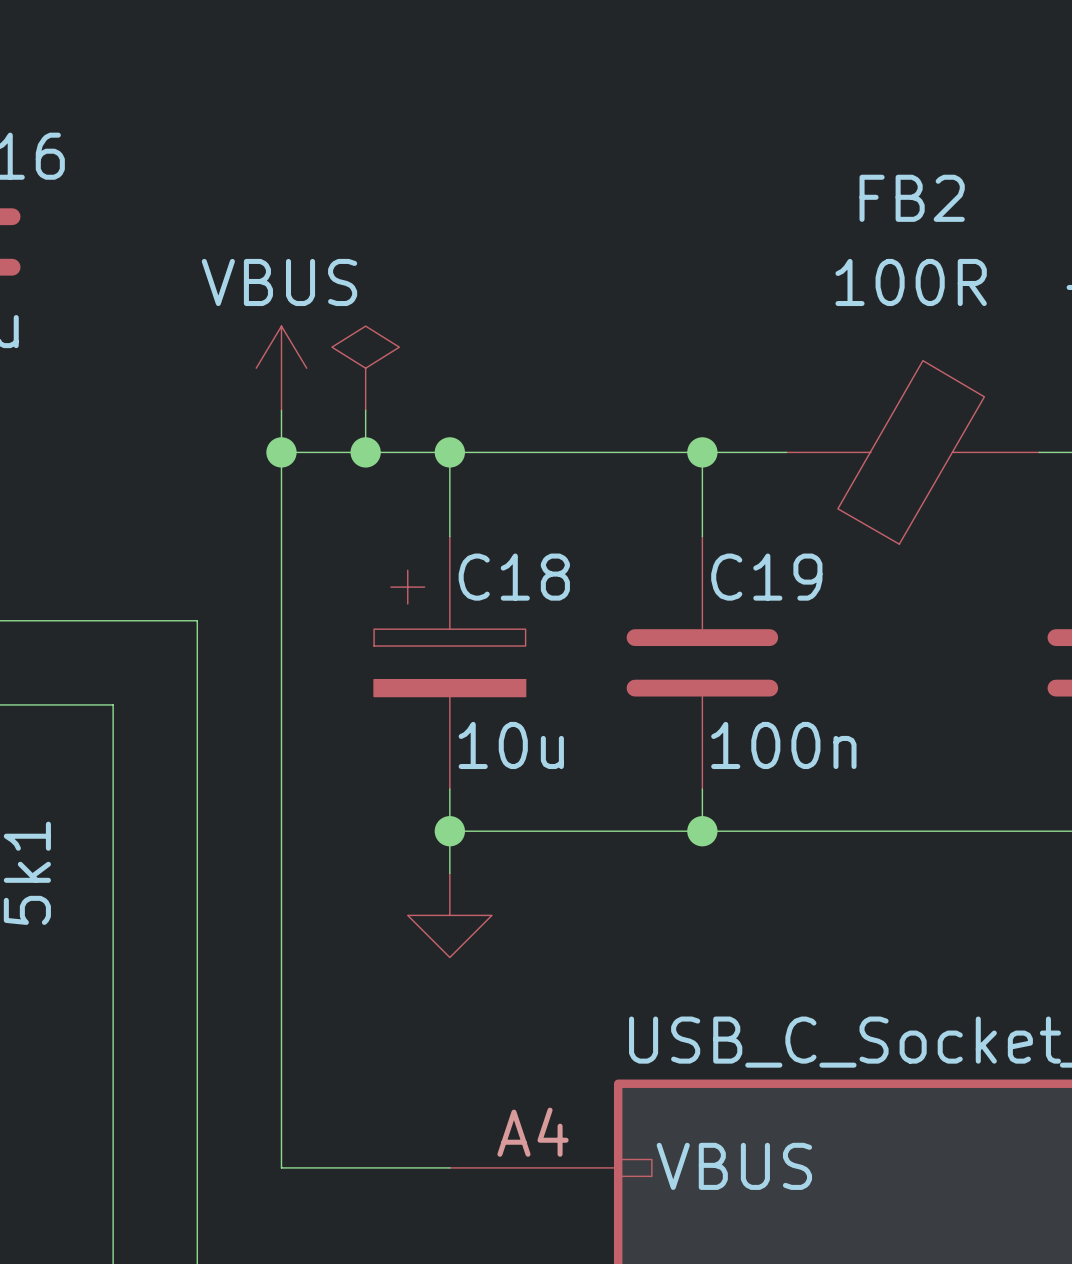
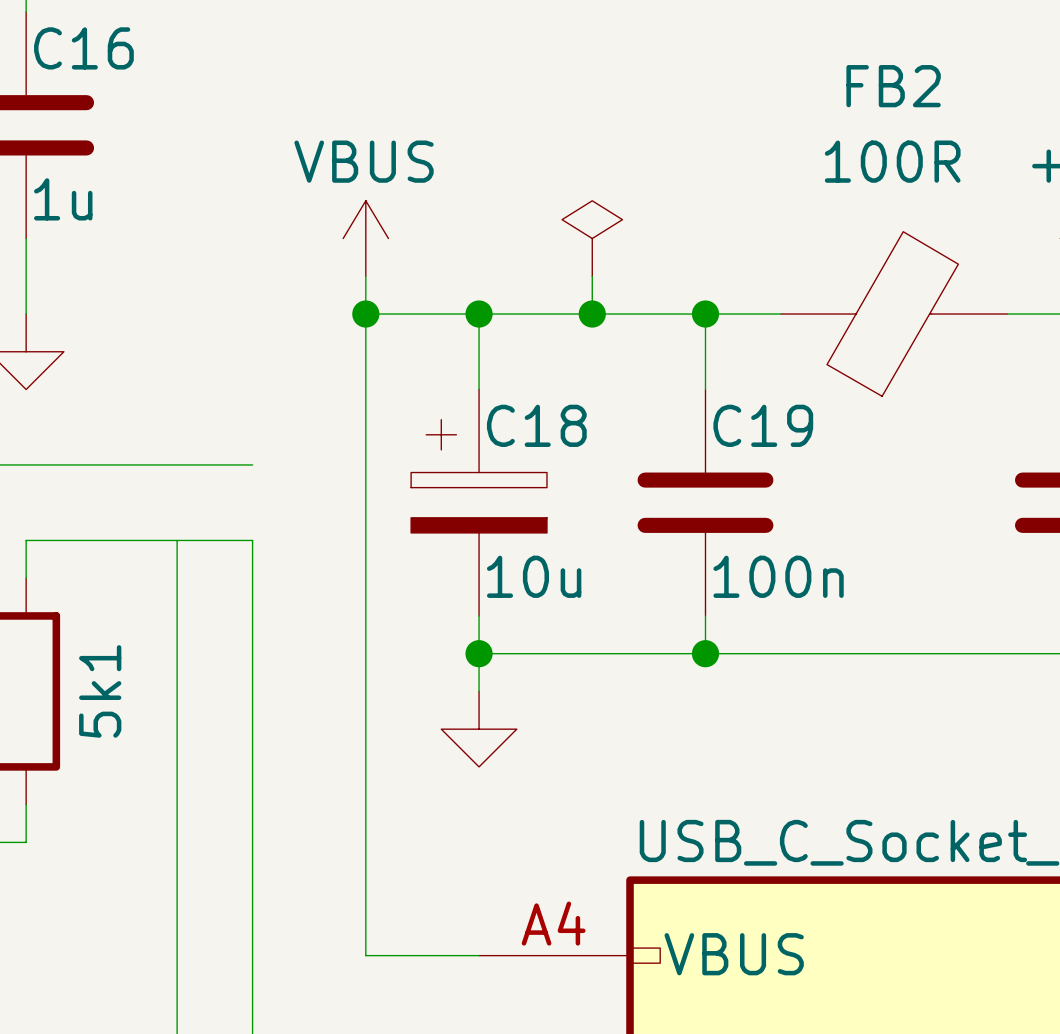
power symbol position: VBUS (281, 368) -> VBUS (365, 238)
power symbol position: (365, 368) -> (592, 238)
wire: (281, 410) (281, 1167) (323, 1167) -> (365, 276) (365, 955)
wire: (365, 410) (365, 452) -> (592, 276) (592, 314)
wire: (281, 452) (323, 452) -> none
junction: (281, 452) -> none
junction: none -> (365, 314)
junction: (365, 452) -> none
junction: none -> (592, 314)
wire: (197, 620) (197, 704) -> (177, 540) (252, 540)

